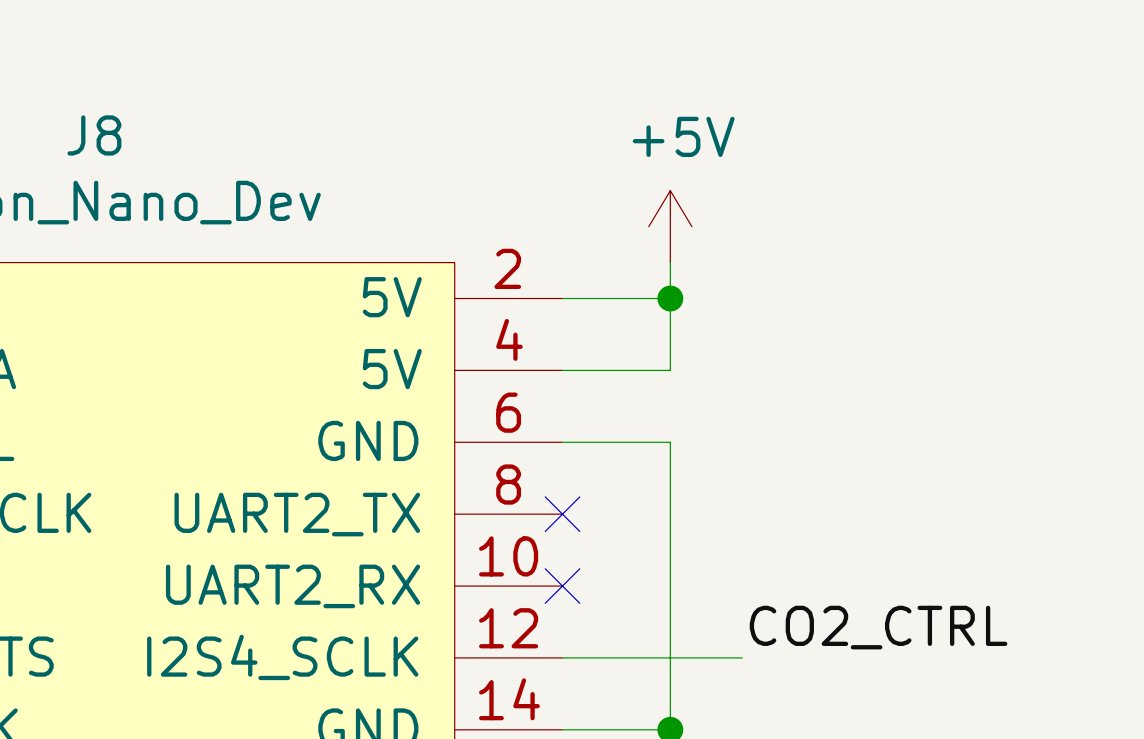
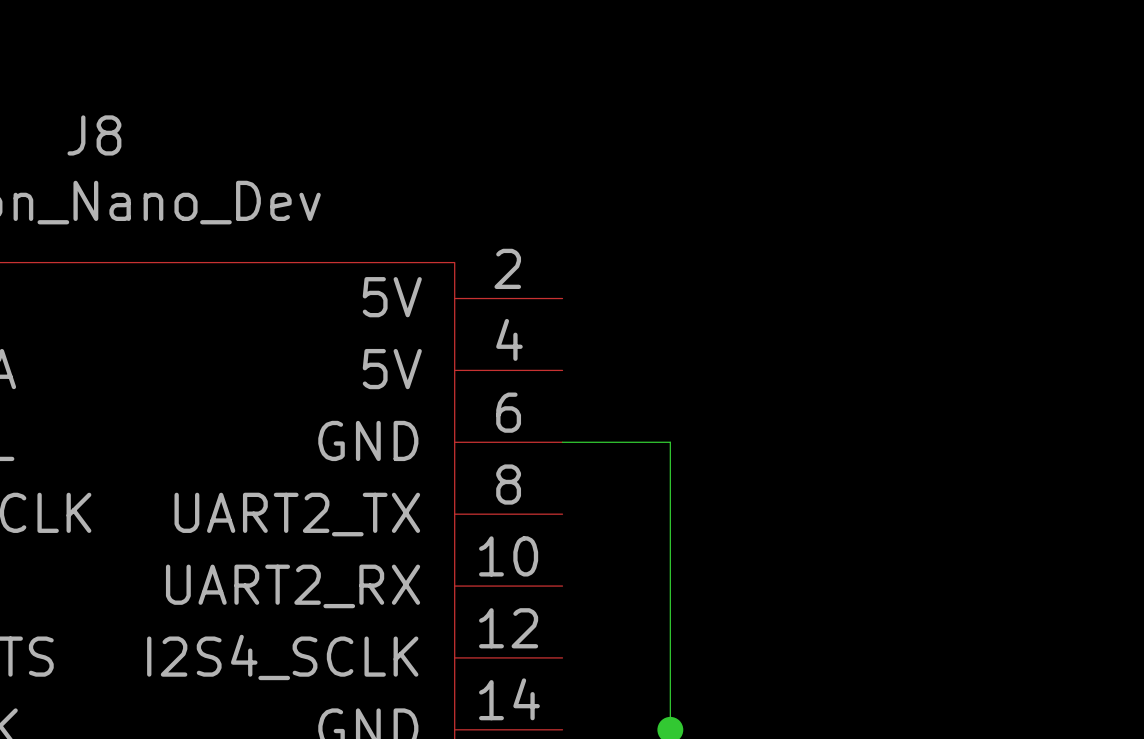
power symbol: +5V (670, 226) -> none
wire: (670, 262) (670, 370) (562, 370) -> none
wire: (562, 298) (670, 298) -> none
junction: (670, 298) -> none
no-connect mark: (562, 514) -> none
no-connect mark: (562, 586) -> none
label: CO2_CTRL (878, 627) -> none
wire: (562, 657) (742, 657) -> none
wire: (562, 729) (670, 729) -> none

